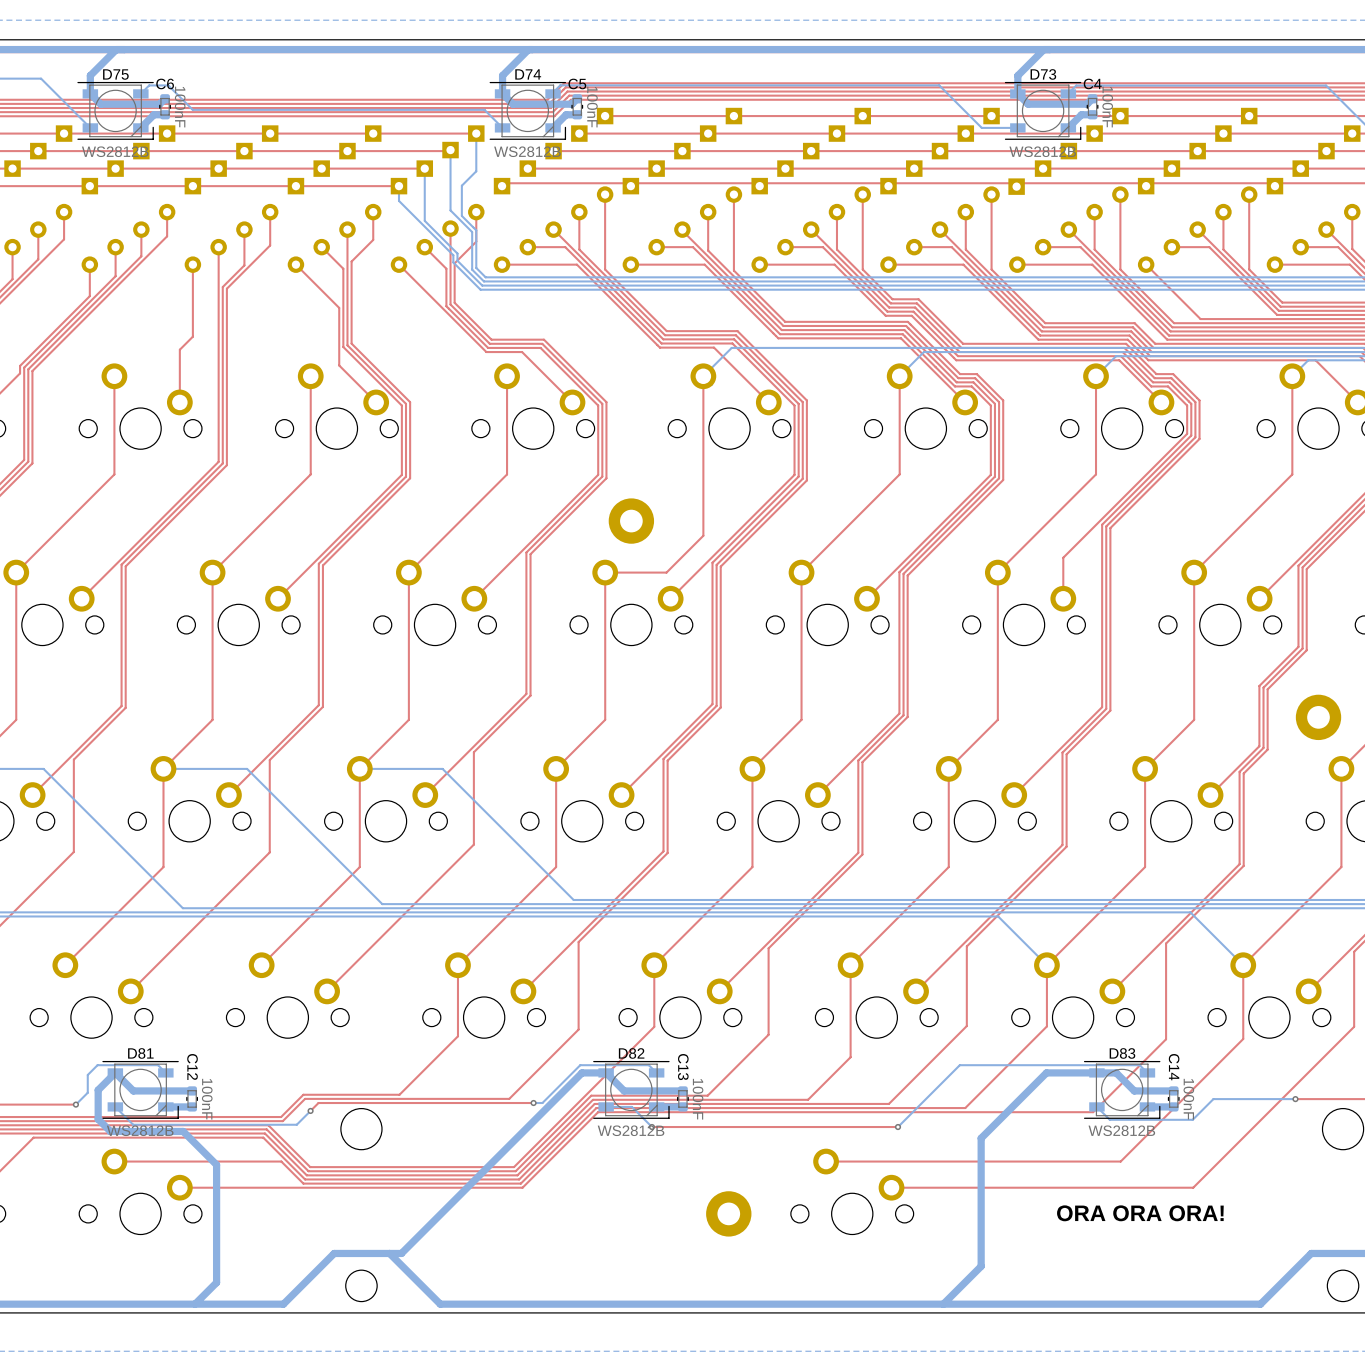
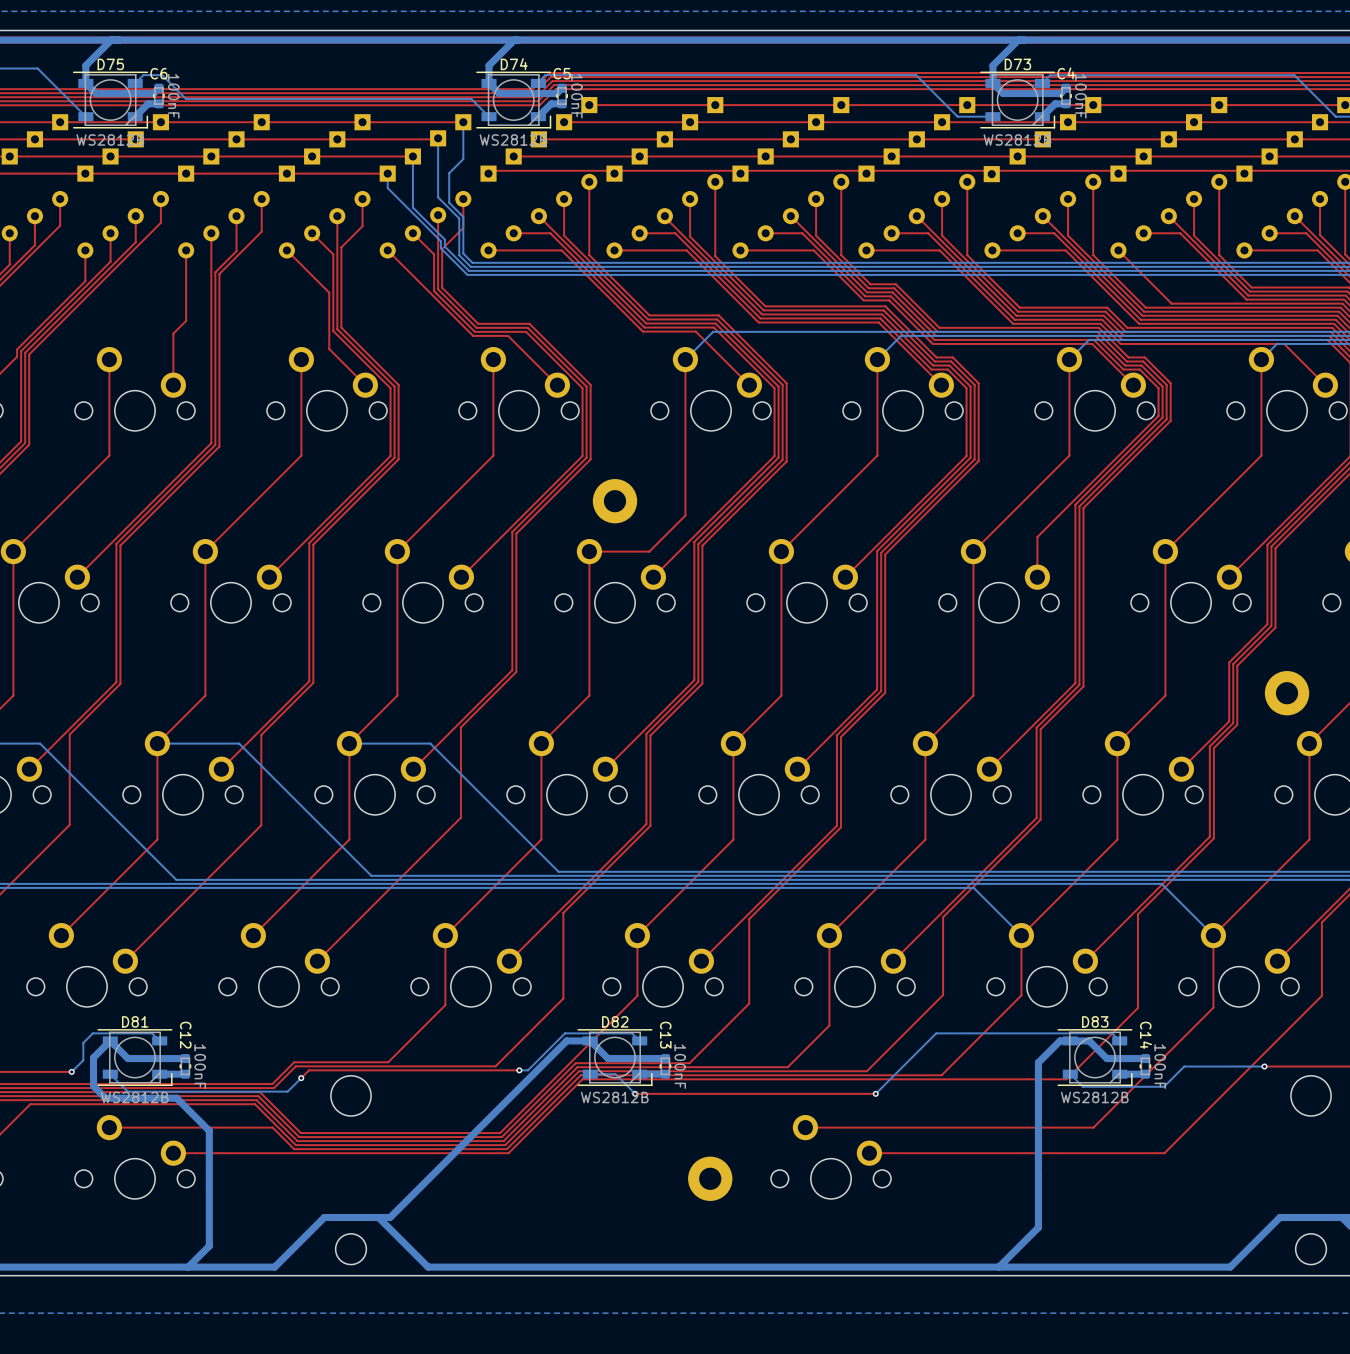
bottom track: (1086, 1072) (1046, 1072) (981, 1138) (981, 1266) (943, 1304) -> (1060, 1040) (1038, 1062) (1038, 1227) (998, 1267)
text: ORA ORA ORA! (1140, 1213) -> none

